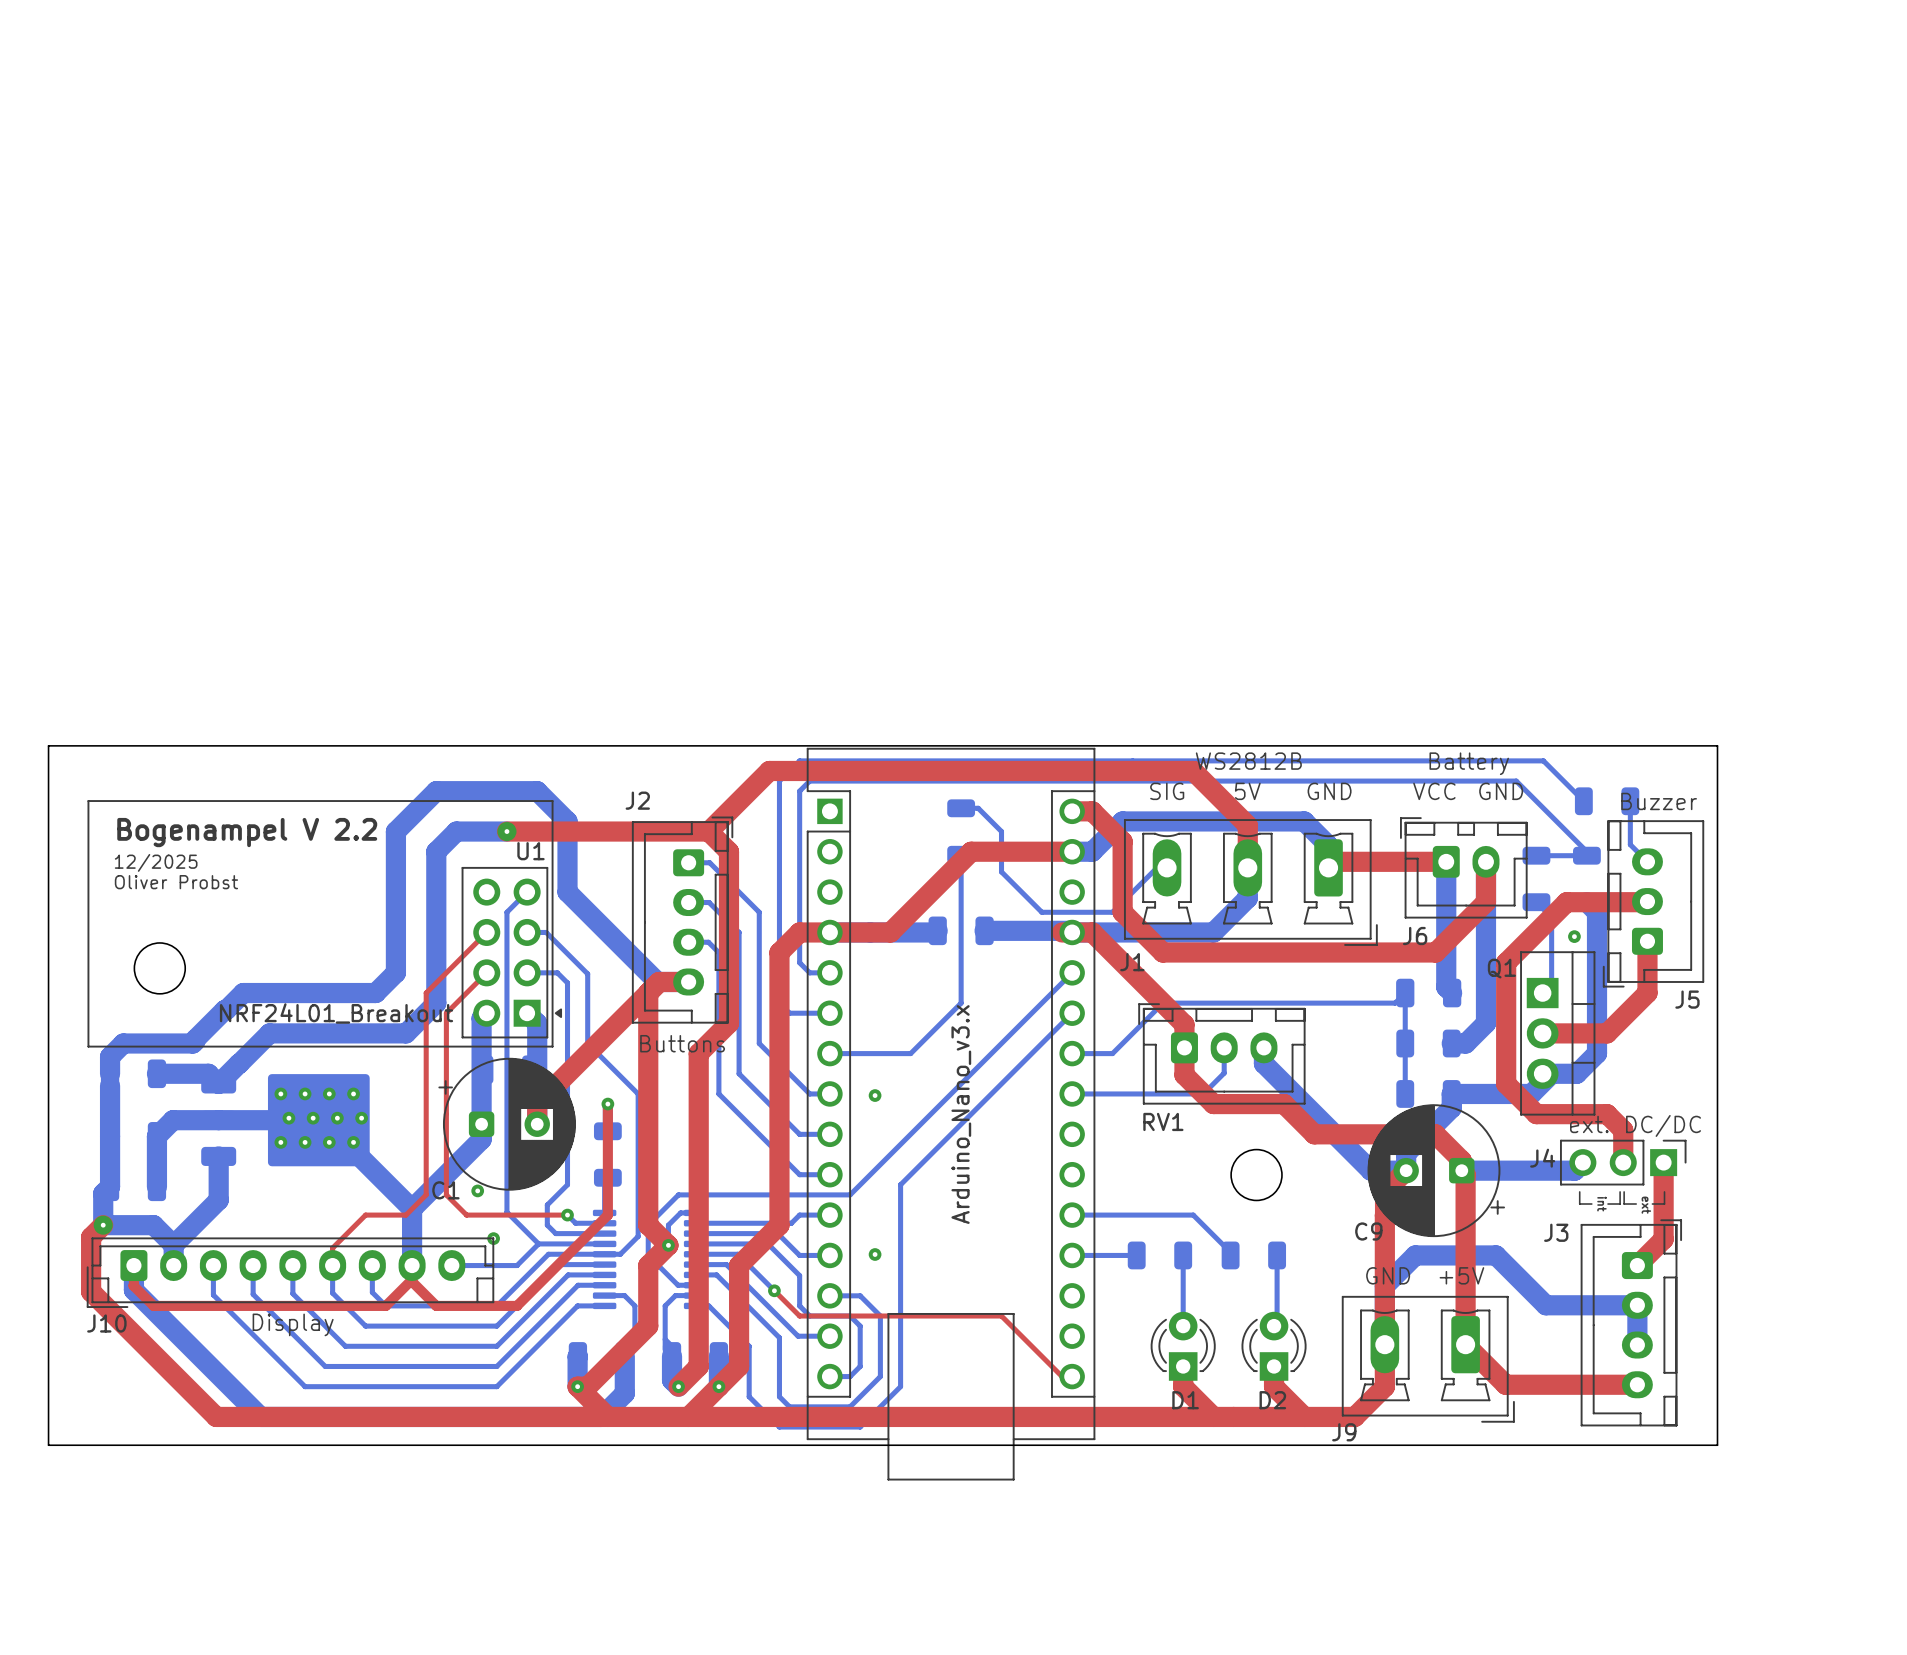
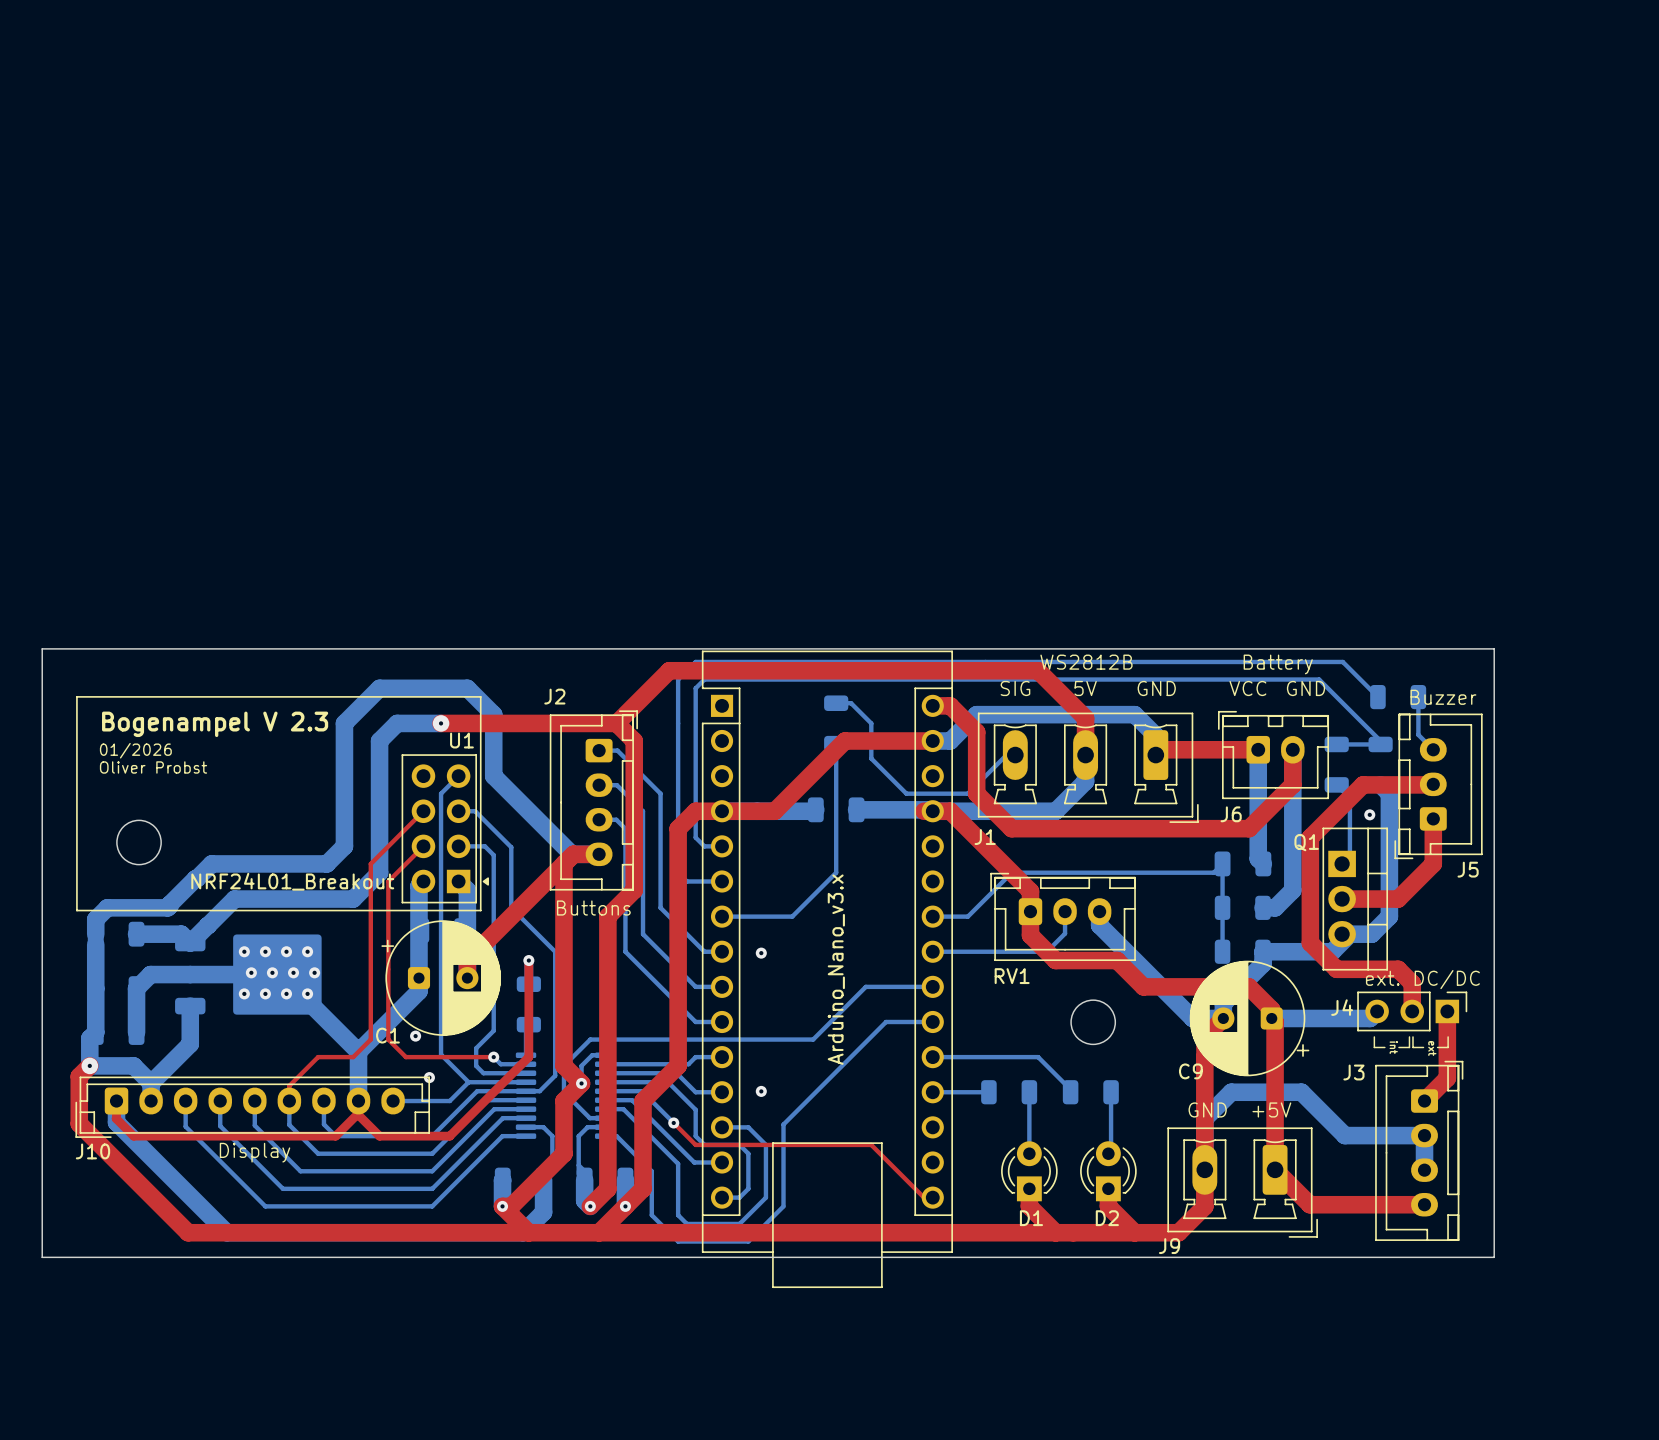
text: Bogenampel V 2.2 (247, 832) -> Bogenampel V 2.3 (215, 724)
text: 12/2025 (156, 862) -> 01/2026 (135, 750)
bottom track: (1072, 972) (850, 1194) -> (932, 986) (865, 986) (813, 1039) (739, 1039)
bottom track: (1072, 1013) (900, 1184) (900, 1292) -> (932, 1021) (886, 1021) (783, 1124)

